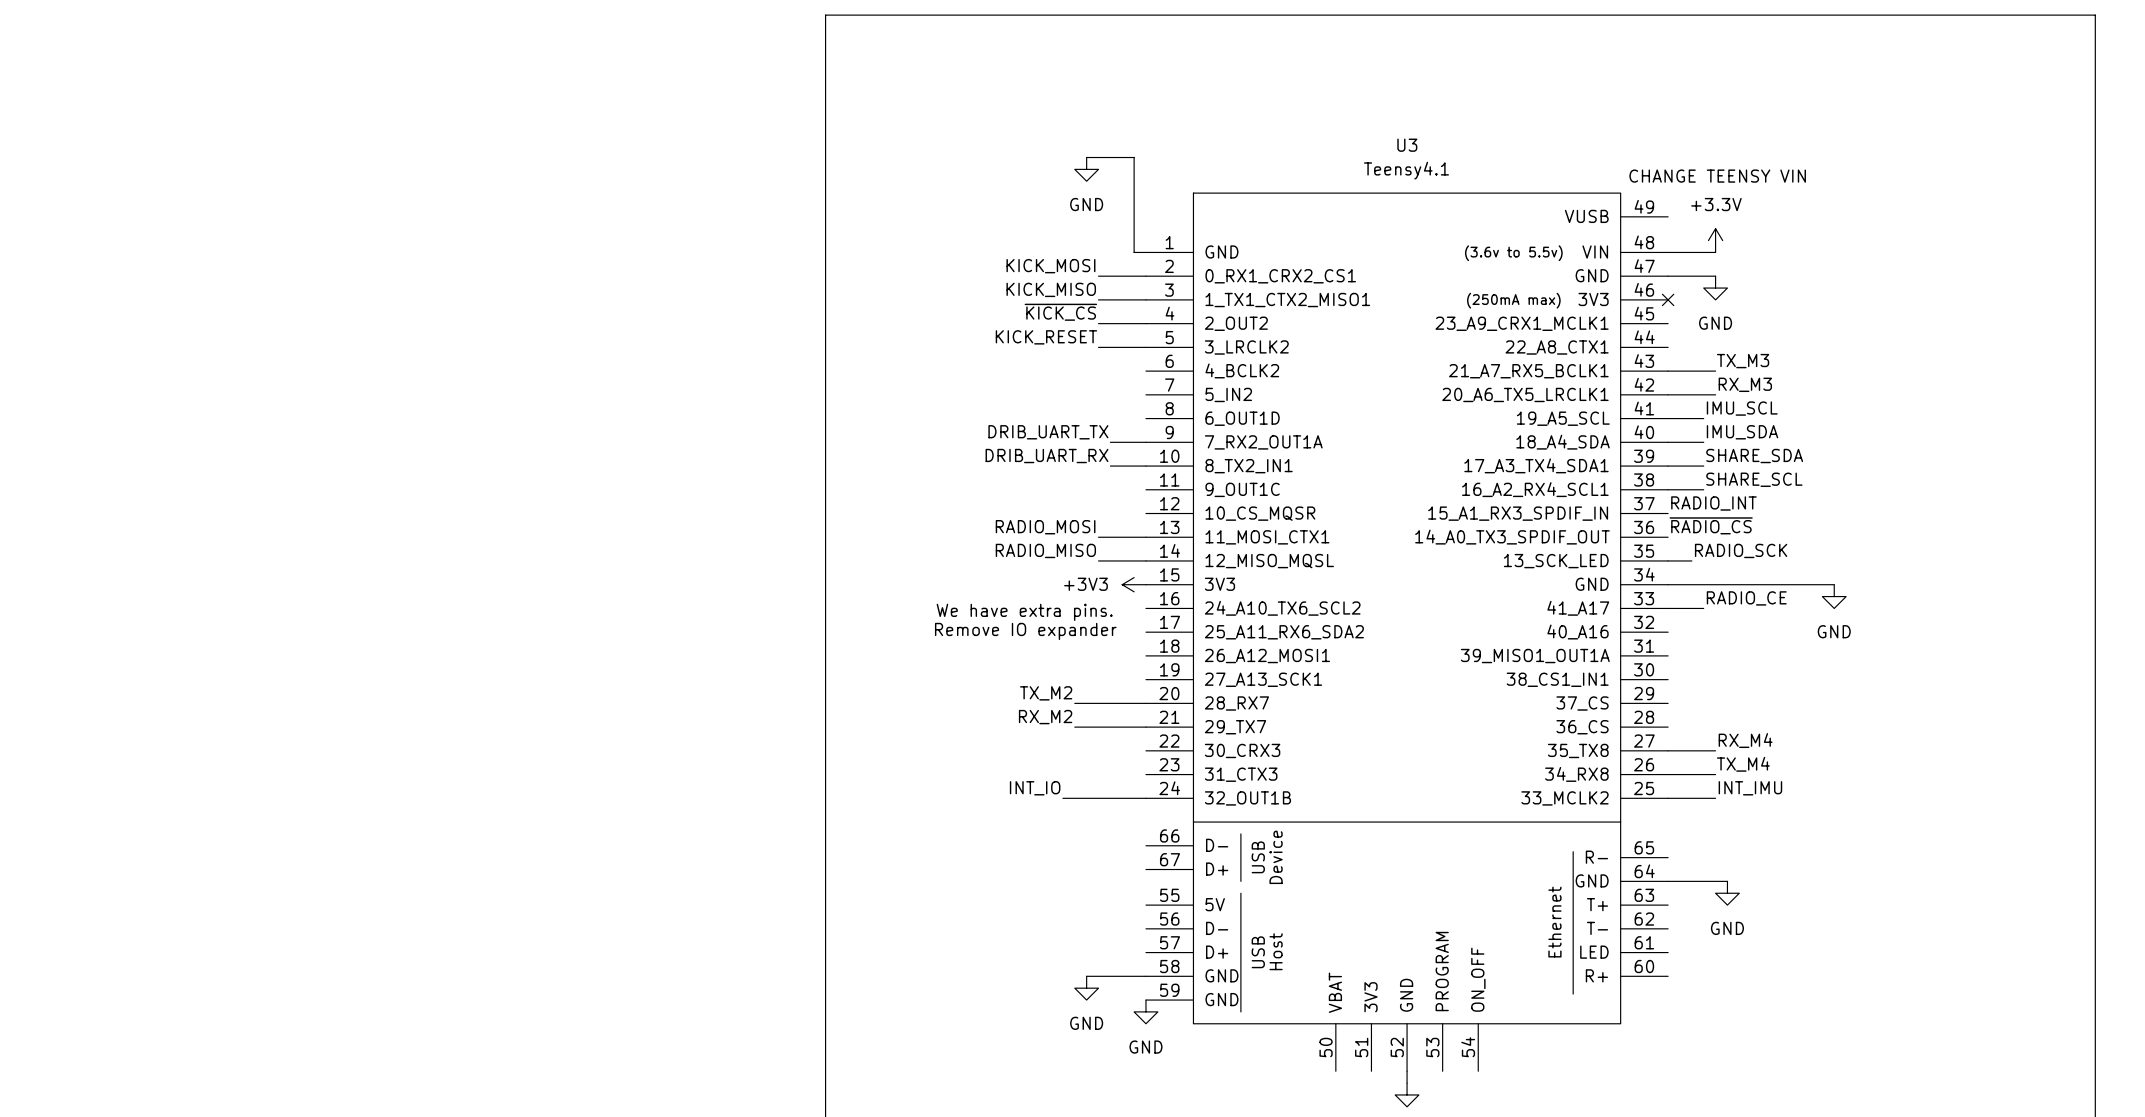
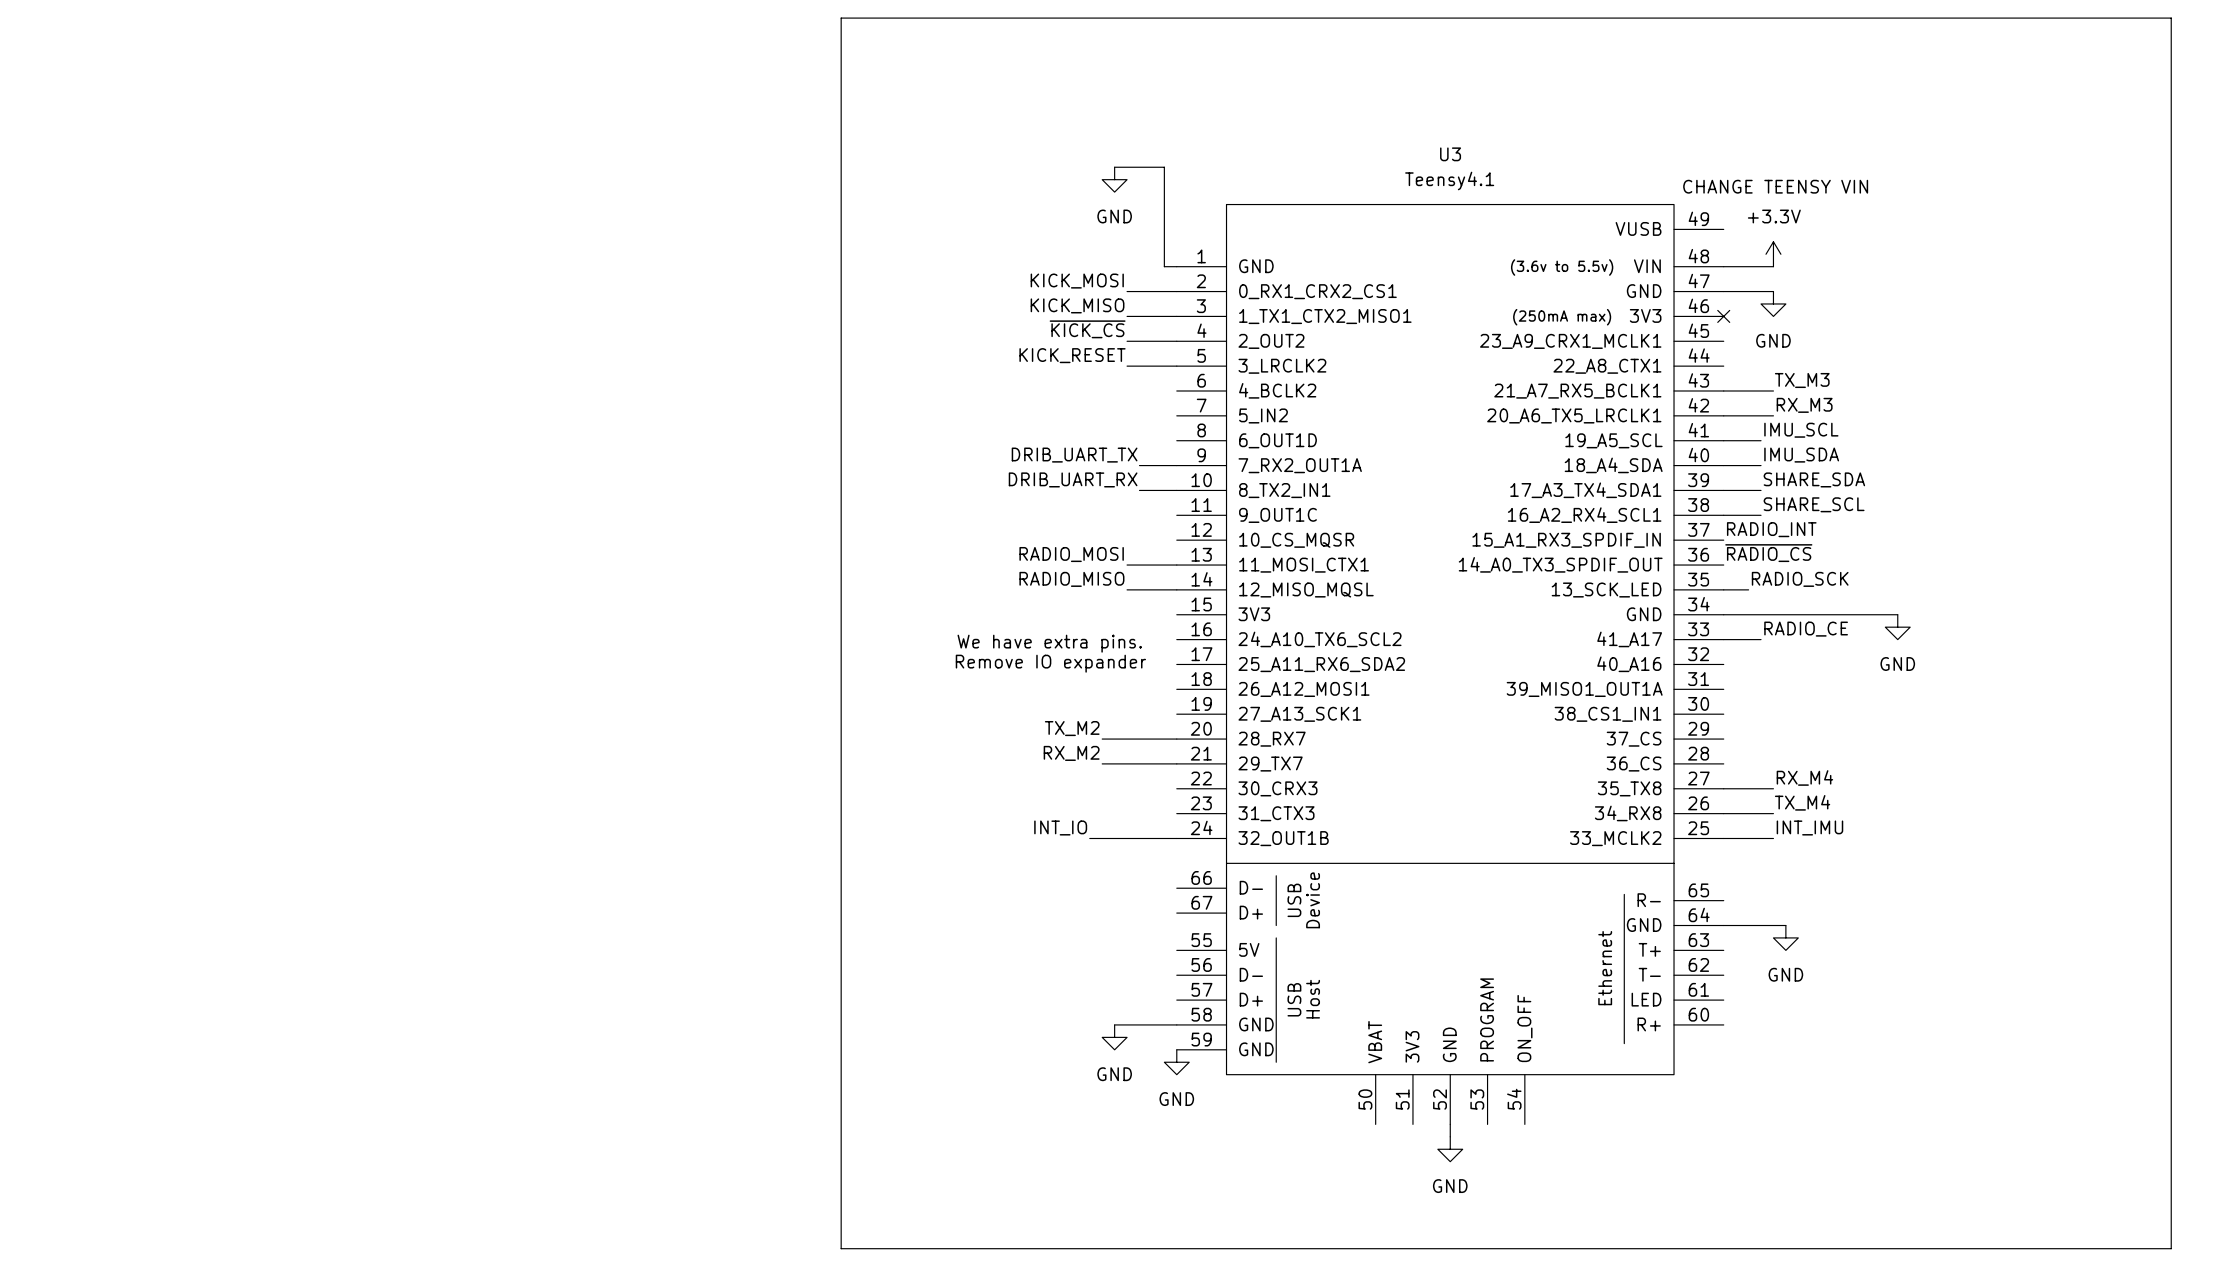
power symbol: +3V3 (1134, 584) -> none

